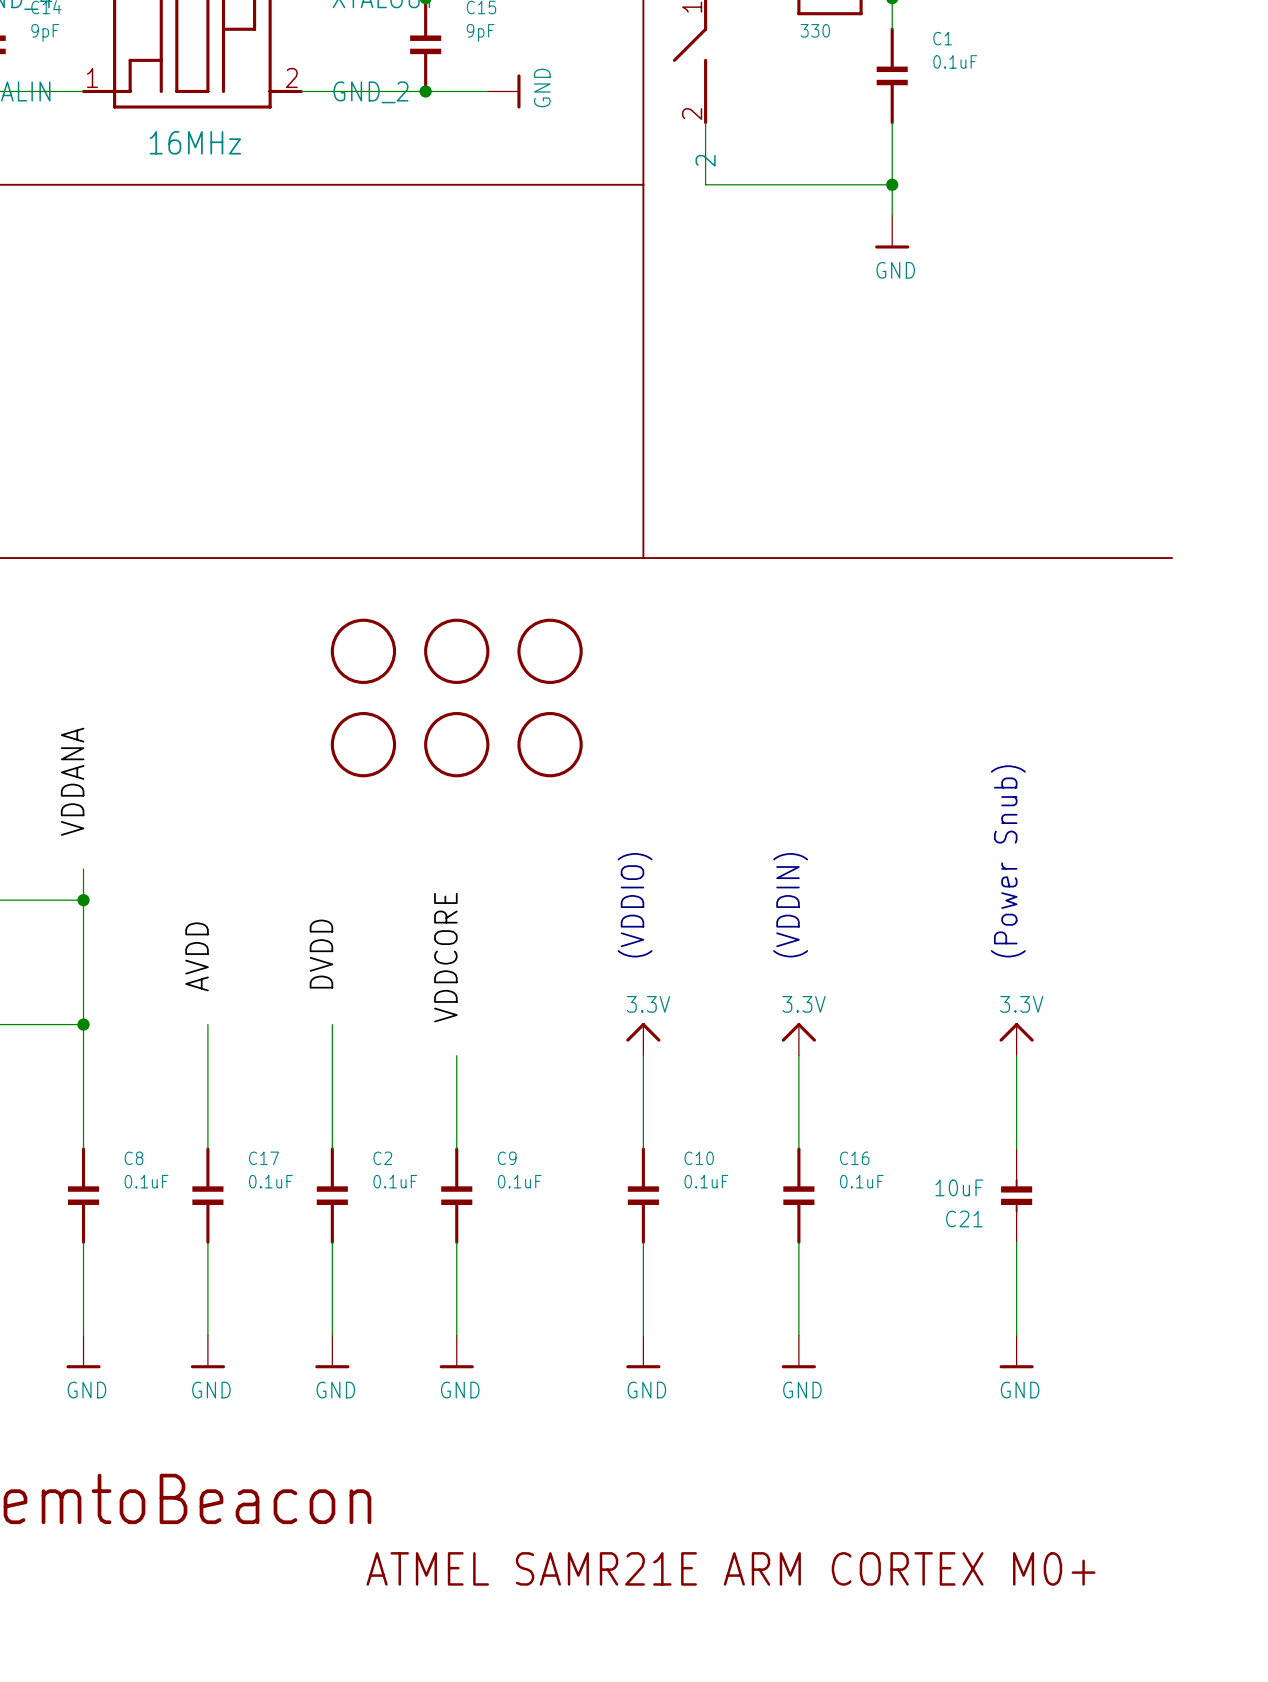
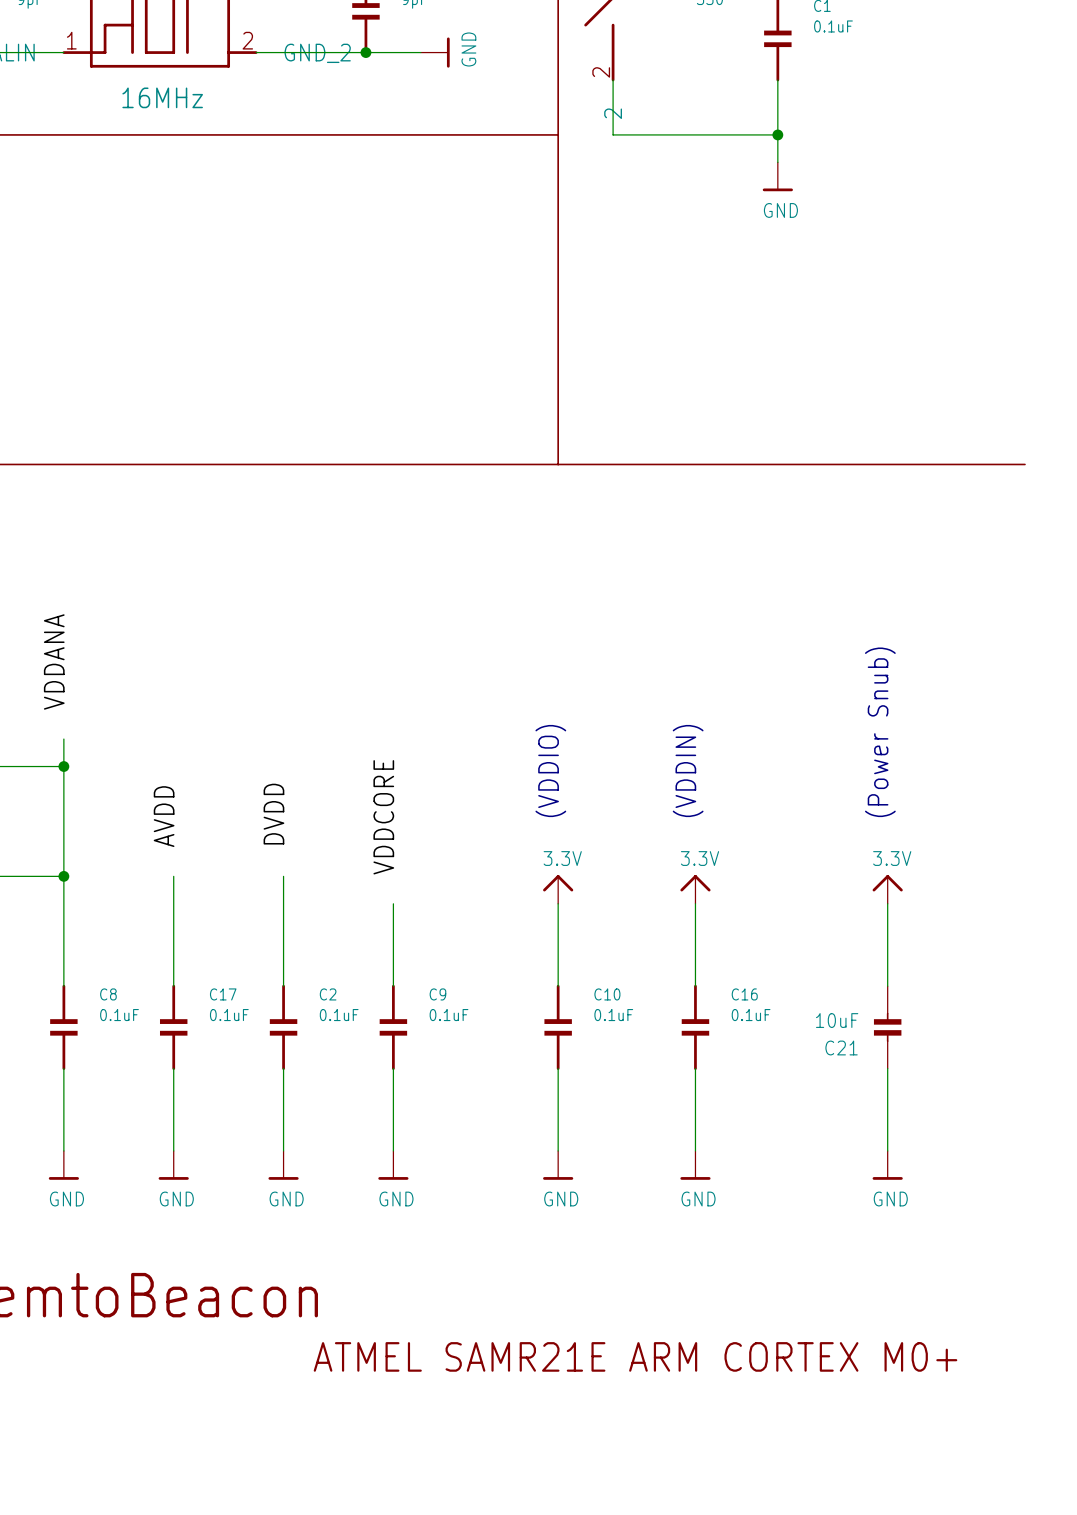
part: (363, 651) -> none
part: (456, 651) -> none
part: (550, 651) -> none
part: (363, 744) -> none
part: (456, 744) -> none
part: (550, 744) -> none

